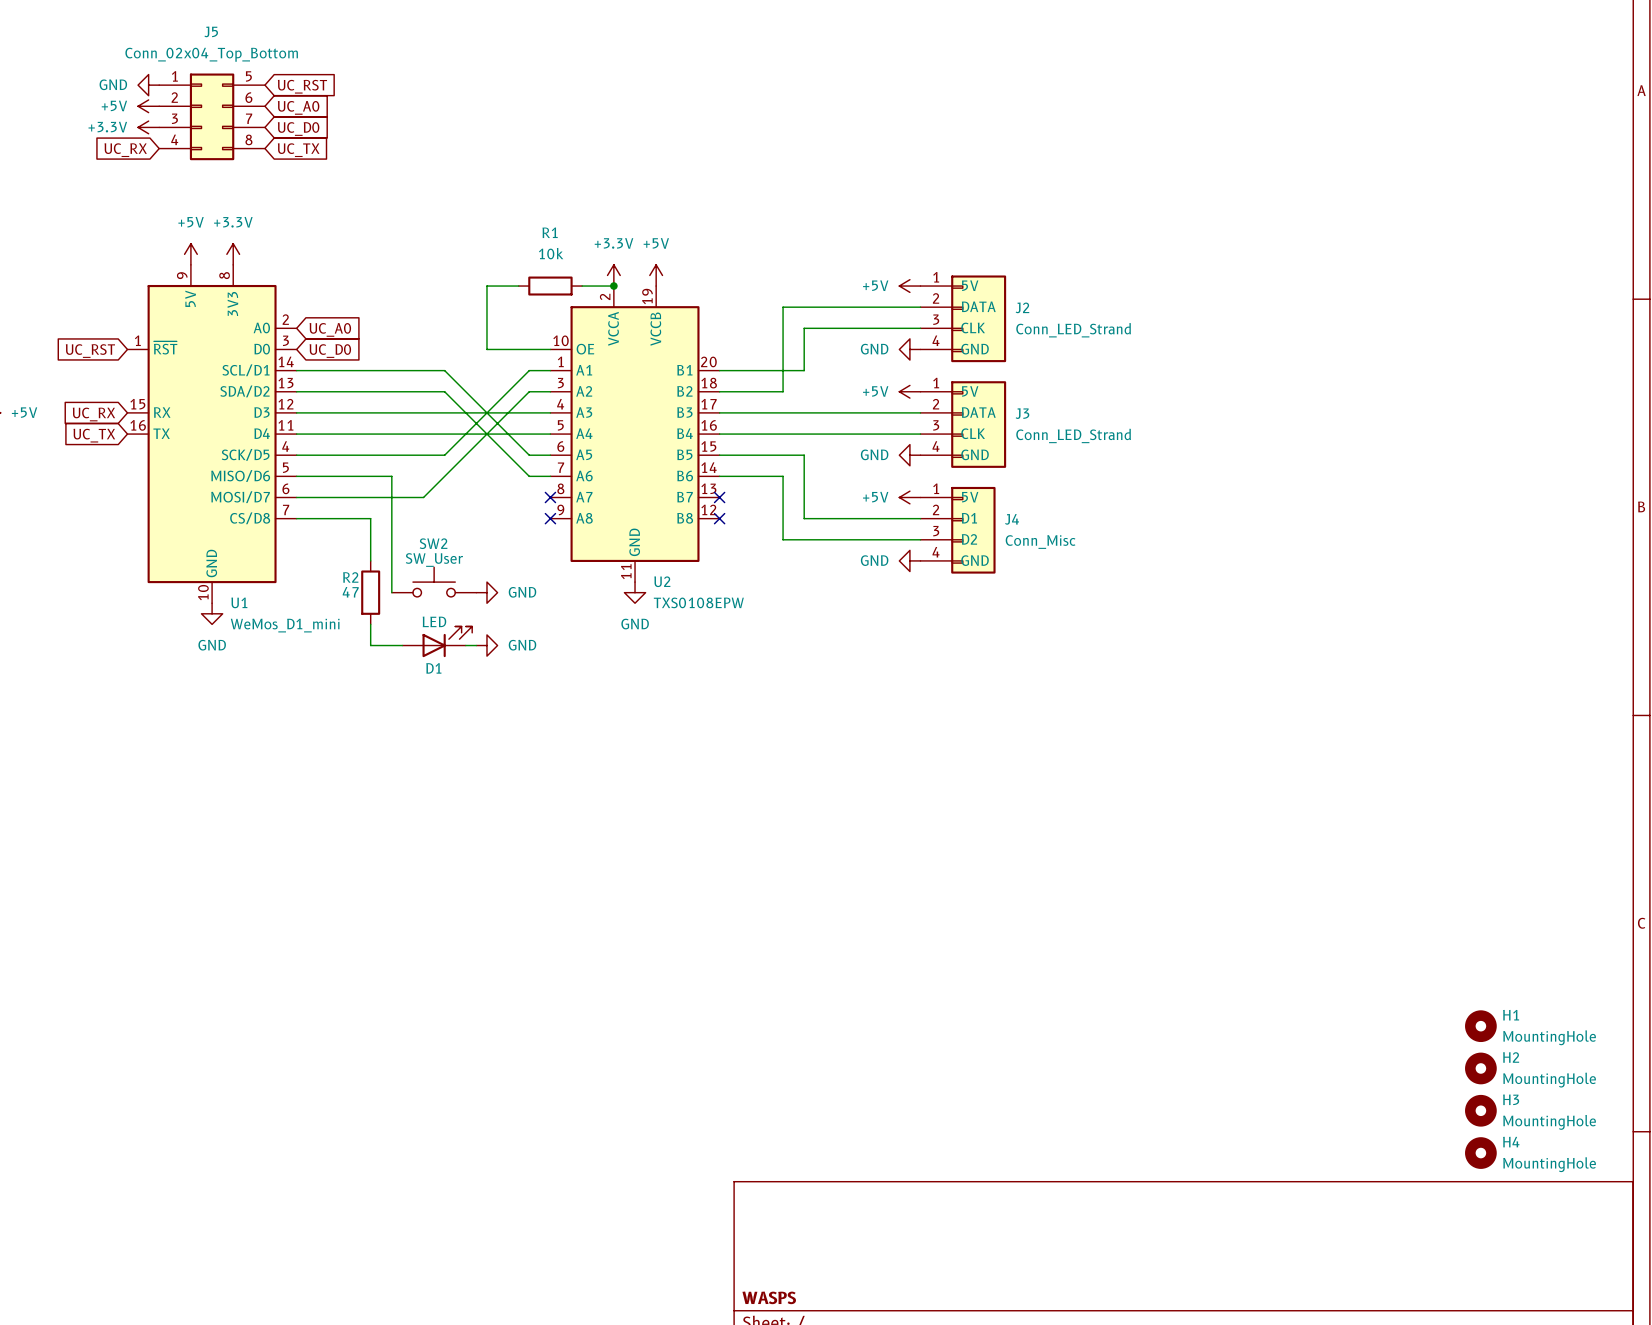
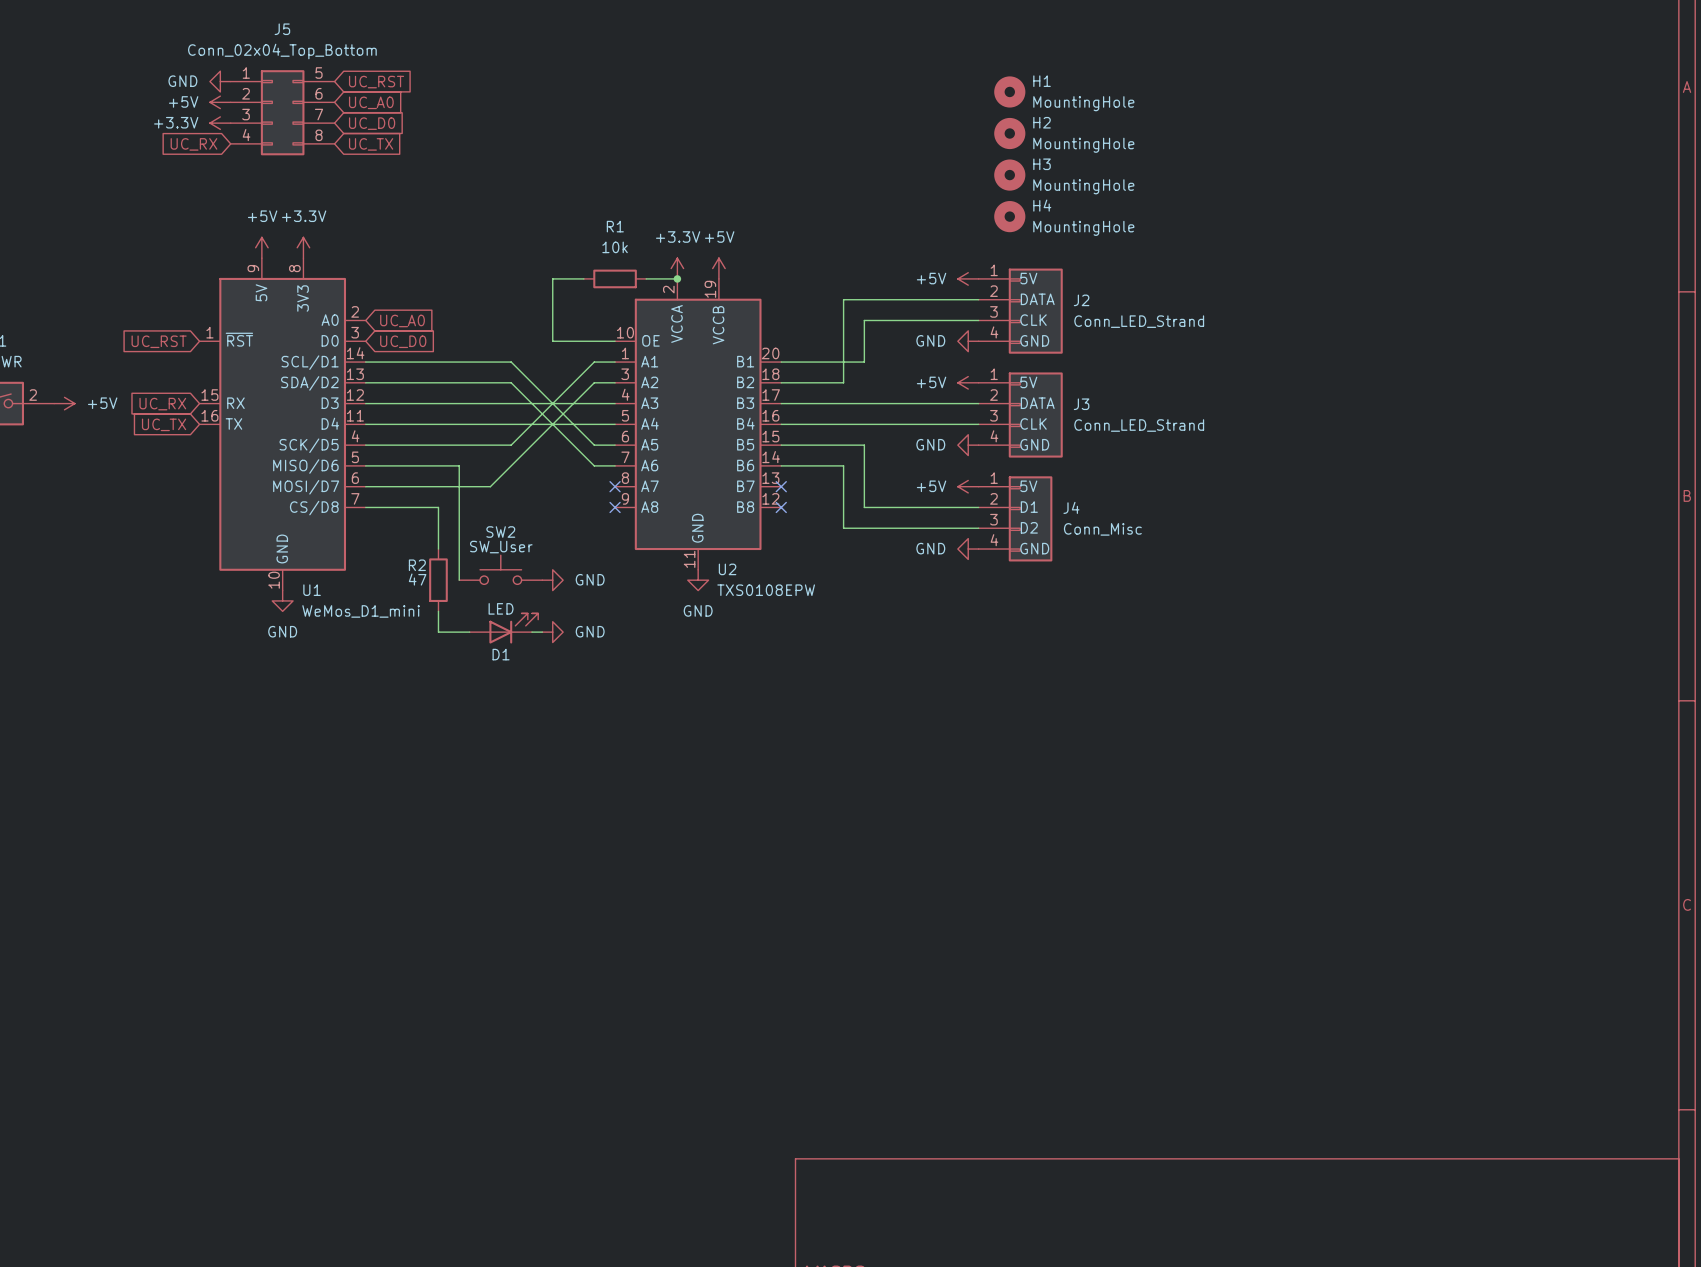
H1 position: (1480, 1026) -> (1009, 91)
H2 position: (1480, 1068) -> (1009, 133)
H3 position: (1480, 1110) -> (1009, 175)
H4 position: (1480, 1153) -> (1009, 216)

